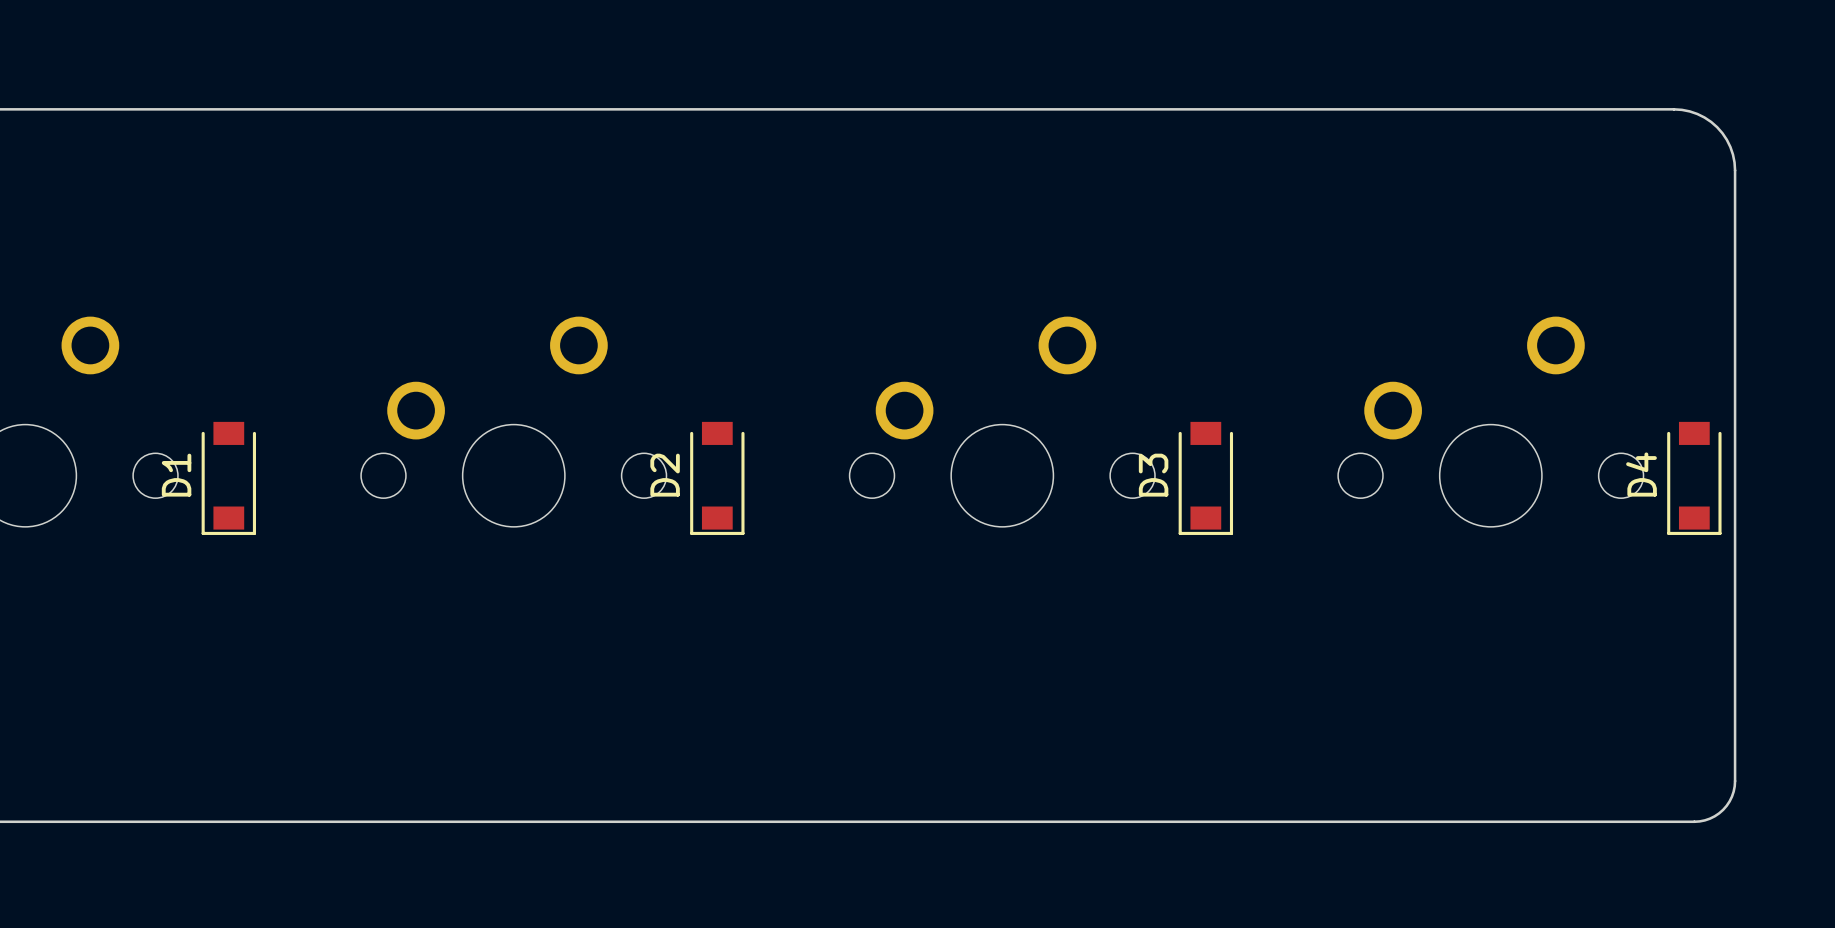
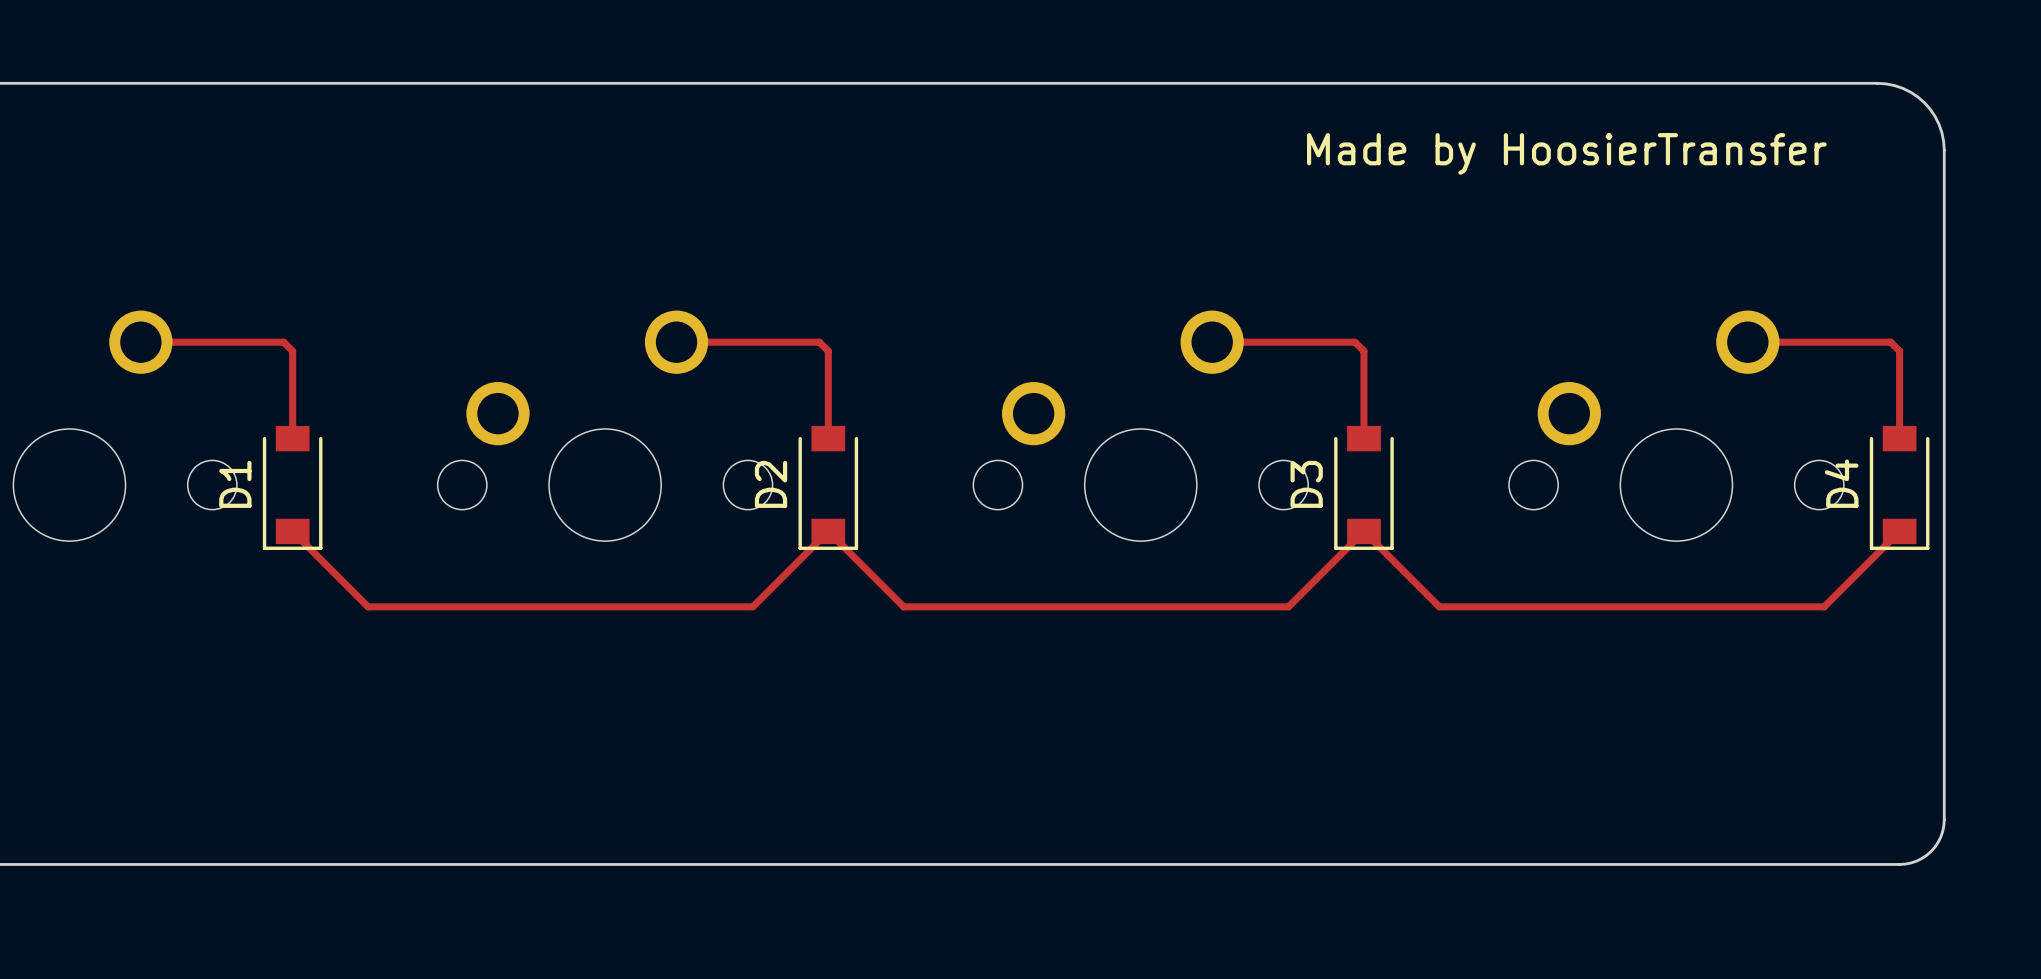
text: none -> Made by HoosierTransfer (1566, 153)
track: none -> (140, 342) (283, 342) (292, 351) (292, 438)
track: none -> (676, 342) (819, 342) (828, 351) (828, 438)
track: none -> (1212, 342) (1355, 342) (1363, 351) (1363, 438)
track: none -> (1747, 342) (1890, 342) (1899, 351) (1899, 438)
track: none -> (292, 531) (368, 606) (752, 606) (828, 531) (903, 606) (1288, 606) (1363, 531) (1439, 606) (1824, 606) (1899, 531)

